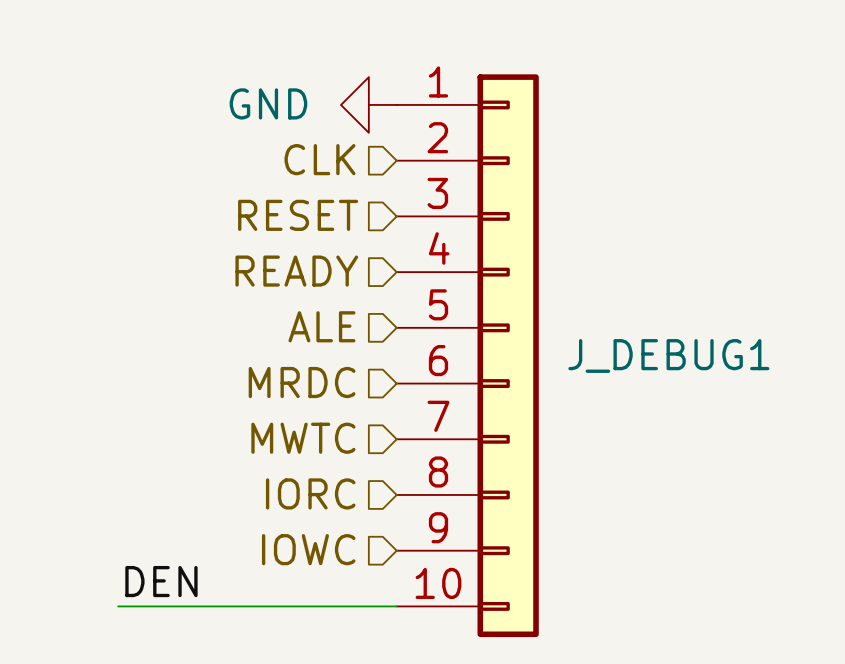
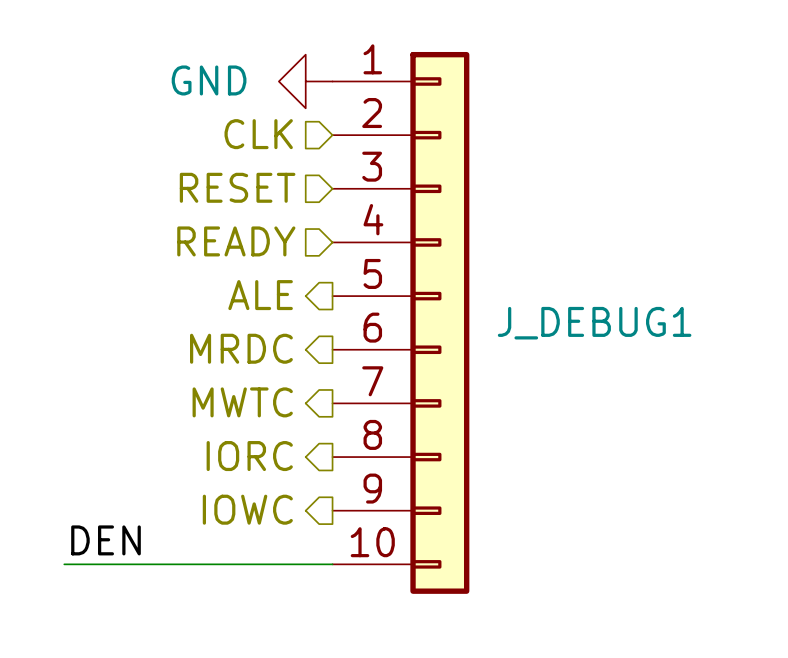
hierarchical label shape: input (321, 326) -> output (260, 295)
hierarchical label shape: input (302, 382) -> output (241, 348)
hierarchical label shape: input (303, 438) -> output (242, 402)
hierarchical label shape: input (310, 493) -> output (249, 456)
hierarchical label shape: input (308, 549) -> output (247, 509)

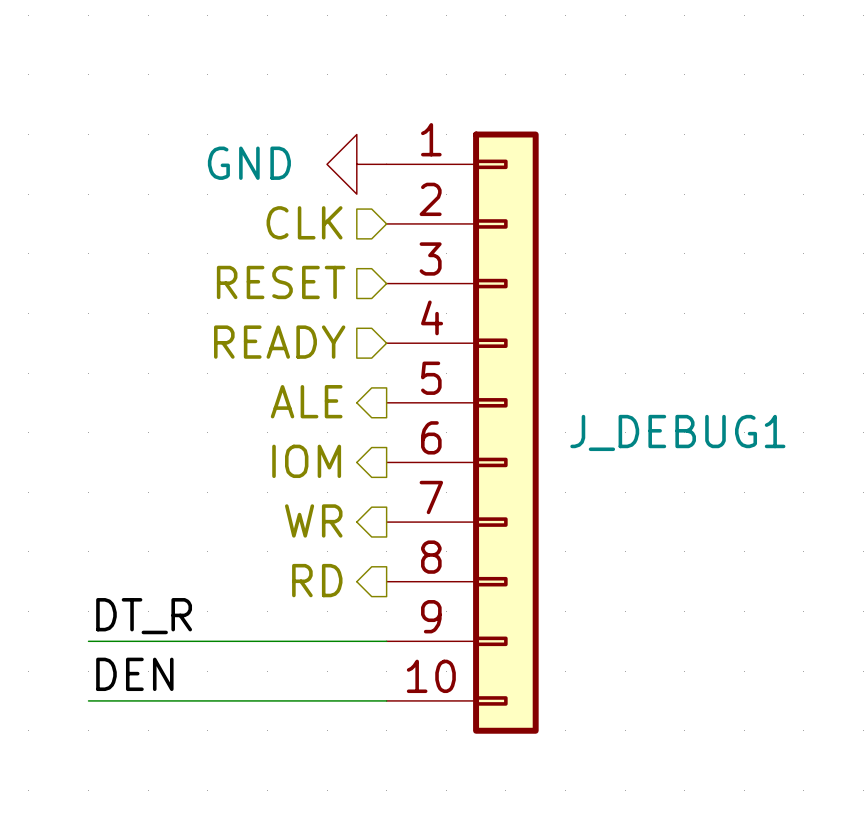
hierarchical label: MRDC (241, 348) -> IOM (306, 461)
hierarchical label: MWTC (242, 402) -> WR (313, 520)
hierarchical label: IORC (249, 456) -> RD (317, 580)
label: none -> DT_R (144, 616)
hierarchical label: IOWC (247, 509) -> none
wire: none -> (88, 641) (386, 641)

